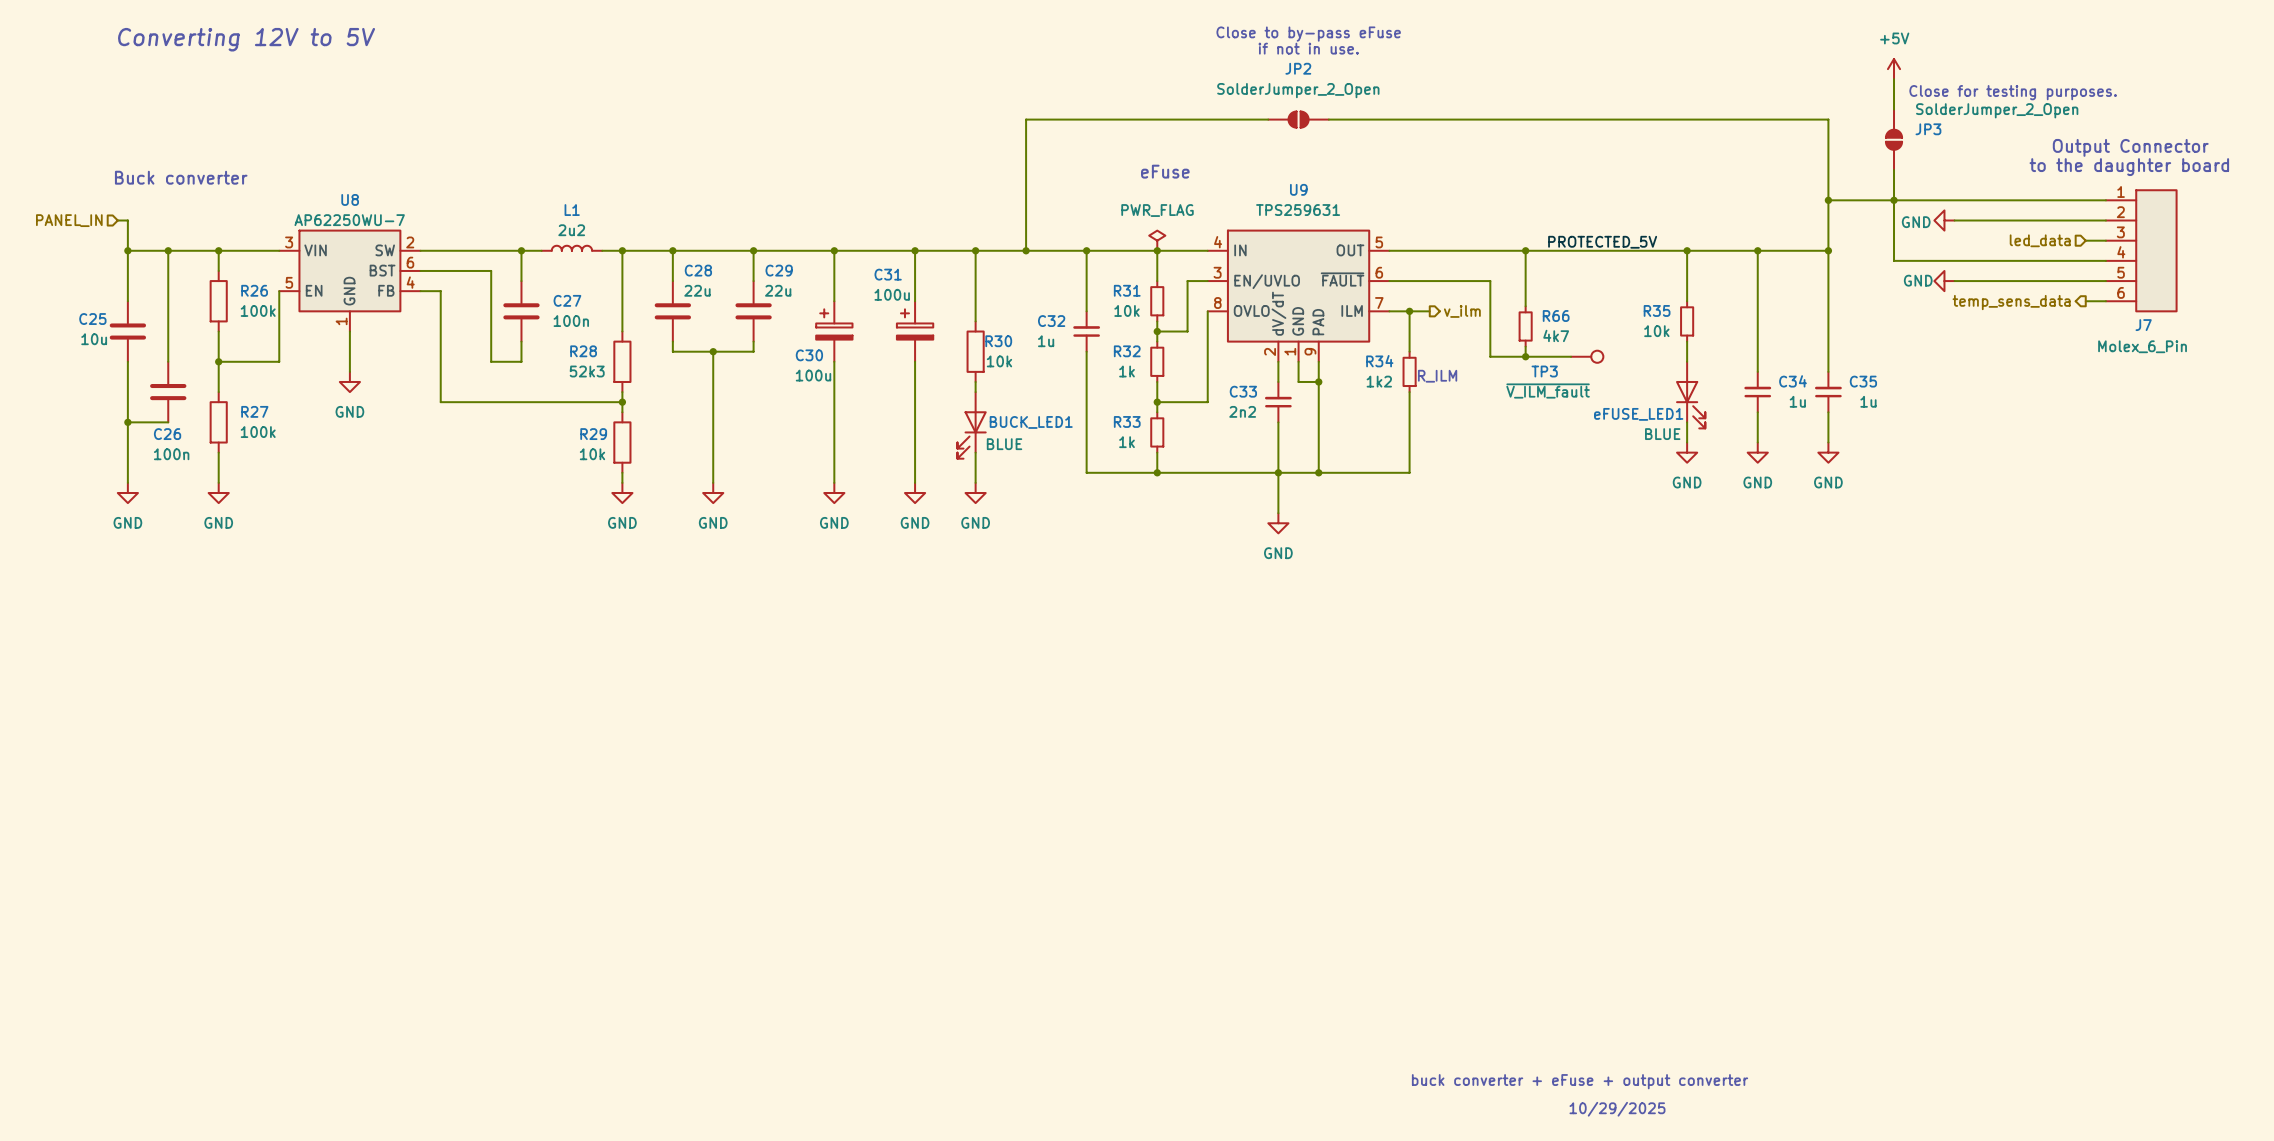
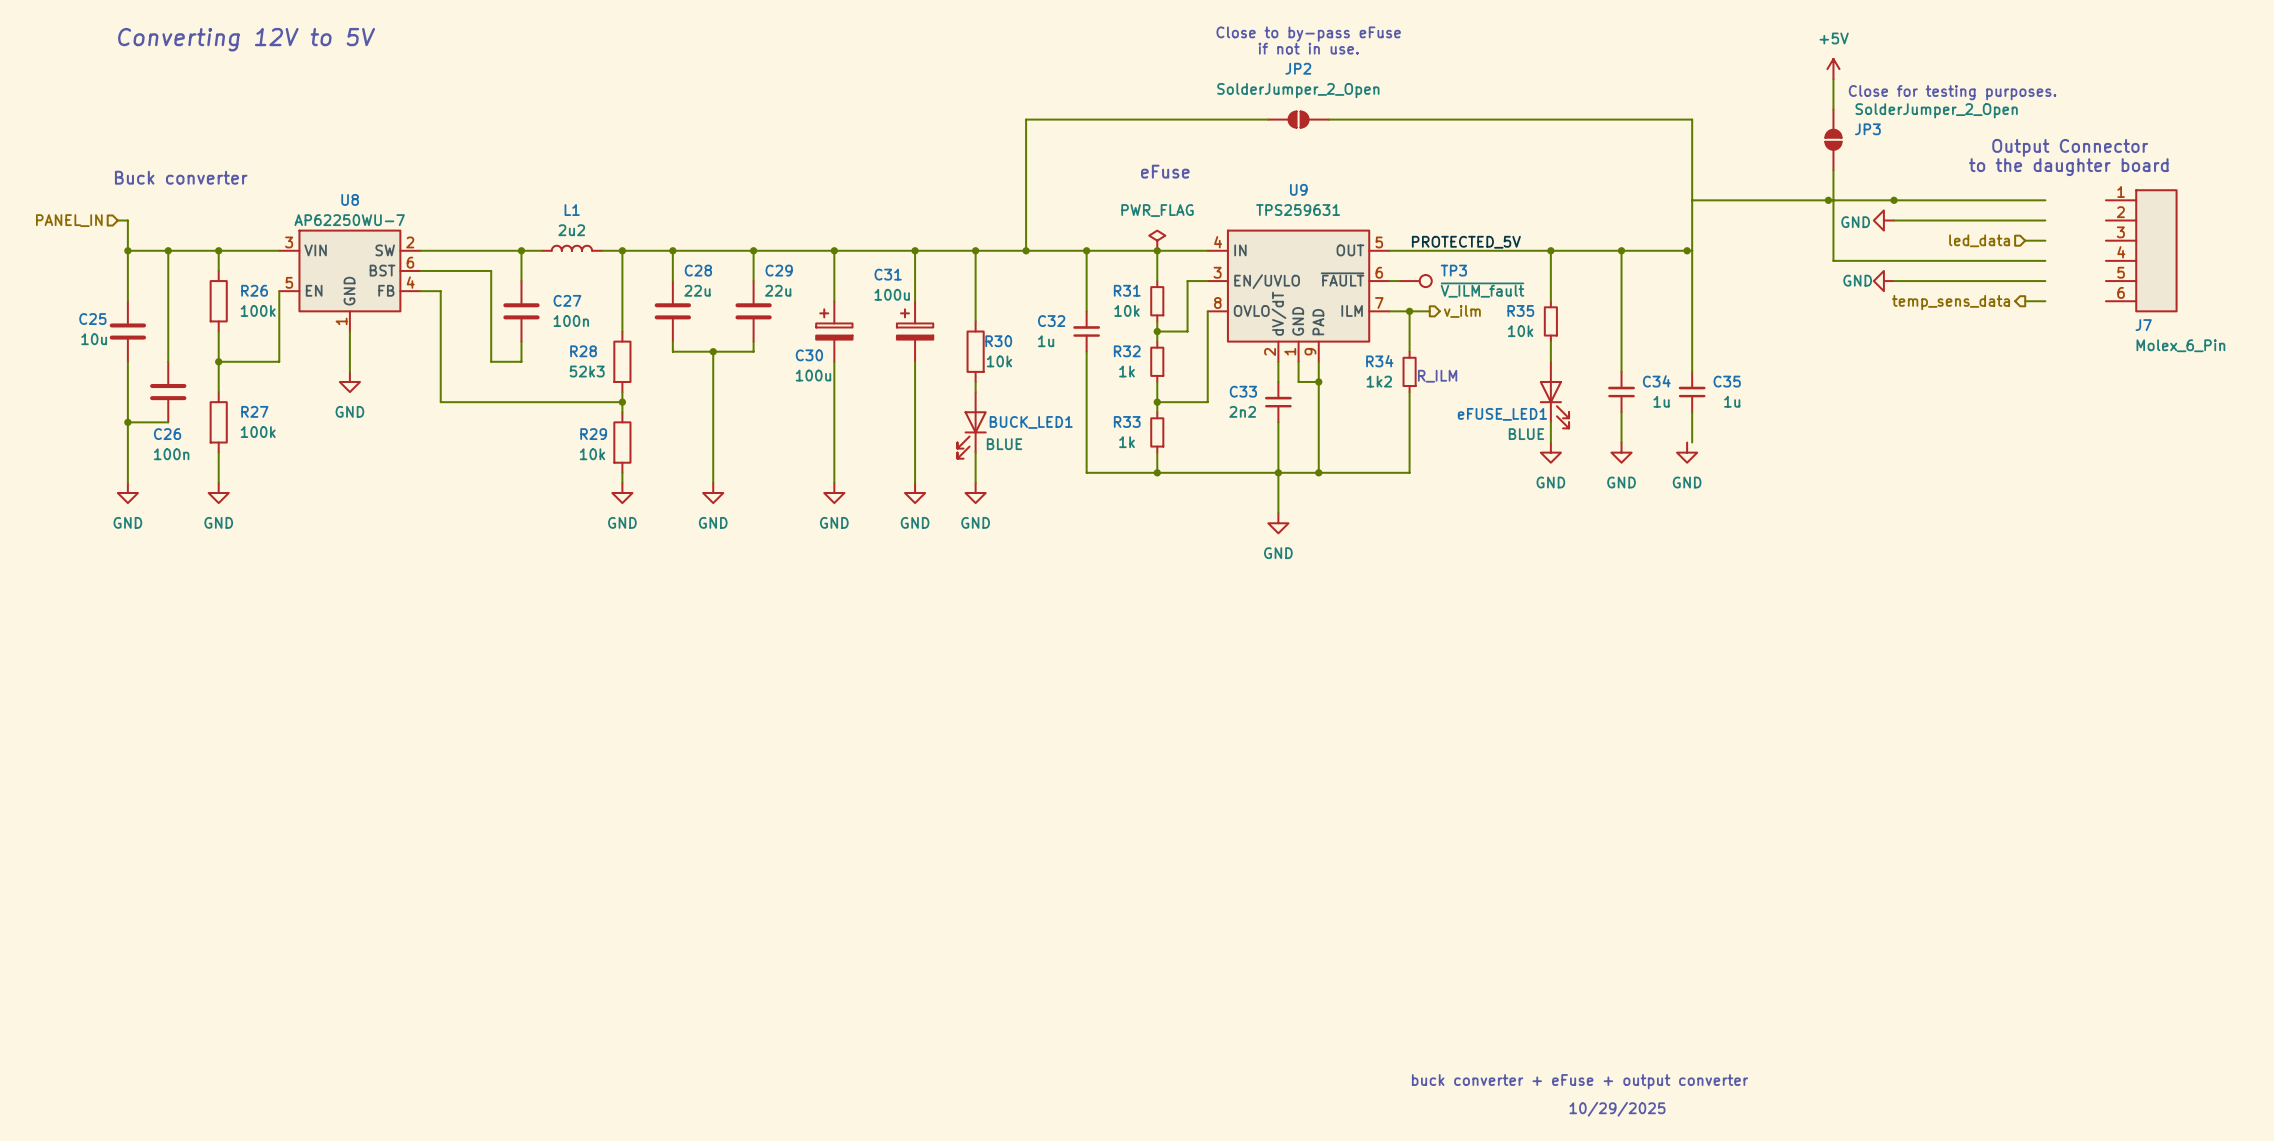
power symbol position: +5V (1894, 69) -> +5V (1833, 69)
wire: (1894, 79) (1894, 109) -> (1833, 79) (1833, 109)
text position: Close for testing purposes. (2013, 92) -> Close for testing purposes. (1952, 92)
wire: (1692, 119) (1828, 119) (1828, 371) -> (1692, 119) (1692, 371)
JP3 position: (1894, 139) -> (1833, 139)
text position: Output Connector (2130, 147) -> Output Connector (2070, 147)
text position: to the daughter board (2129, 167) -> to the daughter board (2068, 167)
wire: (1894, 170) (1894, 260) -> (1833, 170) (1833, 260) (1894, 260)
wire: (2045, 200) (2105, 200) -> none
power symbol: none -> GND (1883, 220)
power symbol: GND (1944, 220) -> none
wire: (2045, 220) (2105, 220) -> (1894, 220) (1954, 220)
hierarchical label position: led_data (2040, 240) -> led_data (1979, 240)
wire: (2085, 240) (2105, 240) -> (2025, 240) (2045, 240)
label position: PROTECTED_5V (1602, 242) -> PROTECTED_5V (1466, 242)
wire: (1525, 250) (1525, 306) -> none
junction position: (1525, 250) -> (1550, 250)
junction: none -> (1621, 250)
wire: (1687, 250) (1687, 301) -> (1550, 250) (1550, 301)
wire: (1692, 250) (1828, 250) -> (1692, 200) (1828, 200)
wire: (1757, 250) (1757, 371) -> (1621, 250) (1621, 371)
junction: (1757, 250) -> none
junction: (1828, 250) -> none
wire: (2045, 260) (2105, 260) -> none
wire: (1399, 281) (1490, 281) (1490, 356) (1571, 356) -> none
power symbol: none -> GND (1883, 281)
power symbol: GND (1944, 281) -> none
wire: (2045, 281) (2105, 281) -> (1894, 281) (1954, 281)
wire: (2085, 301) (2105, 301) -> (2025, 301) (2045, 301)
hierarchical label position: temp_sens_data (2011, 302) -> temp_sens_data (1951, 302)
R35 position: (1687, 321) -> (1550, 321)
R66: 4k7 (1525, 326) -> none
wire: (1687, 341) (1687, 361) -> (1550, 341) (1550, 361)
wire: (1525, 346) (1525, 356) -> none
J7 value position: Molex_6_Pin (2142, 346) -> Molex_6_Pin (2180, 345)
junction: (1525, 356) -> none
TP3 position: (1587, 356) -> (1415, 281)
TP3 name position: TP3 (1544, 371) -> TP3 (1453, 270)
TP3 value position: ~{V_ILM_fault} (1548, 391) -> ~{V_ILM_fault} (1482, 290)
C34 position: (1757, 392) -> (1621, 392)
C35 position: (1828, 392) -> (1692, 392)
eFUSE_LED1 position: (1690, 395) -> (1554, 395)
wire: (1757, 412) (1757, 442) -> (1621, 412) (1621, 442)
wire: (1828, 412) (1828, 442) -> (1692, 412) (1692, 442)
wire: (1687, 422) (1687, 442) -> (1550, 422) (1550, 442)
power symbol: none -> GND (1550, 452)
power symbol: none -> GND (1621, 452)
power symbol: GND (1757, 452) -> none
power symbol: GND (1828, 452) -> none

